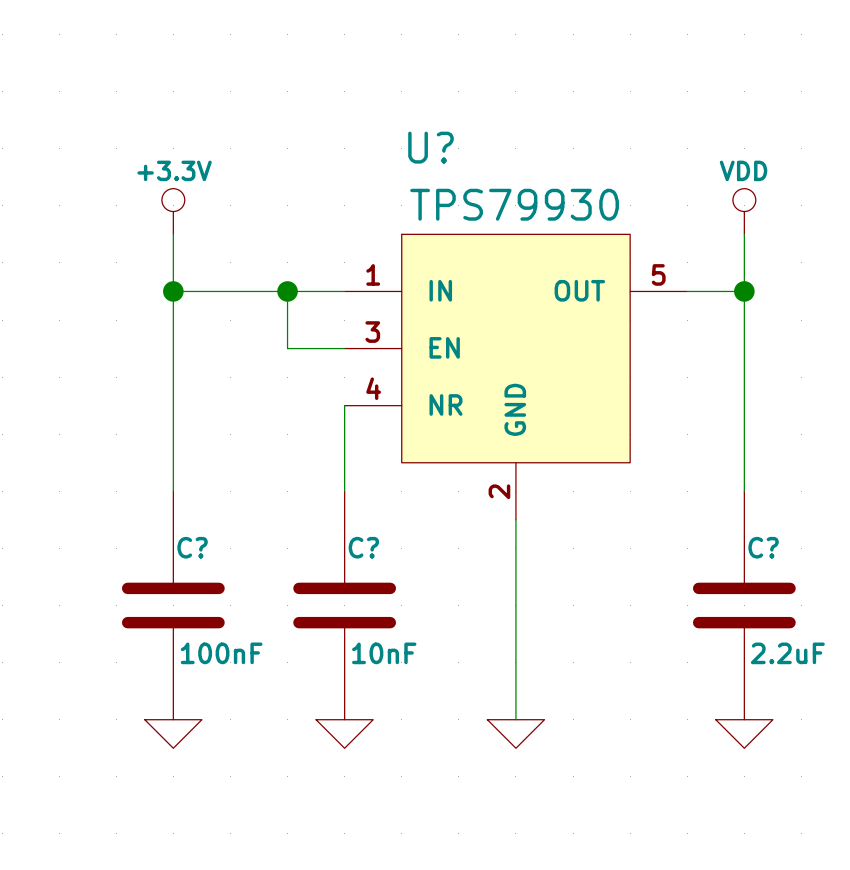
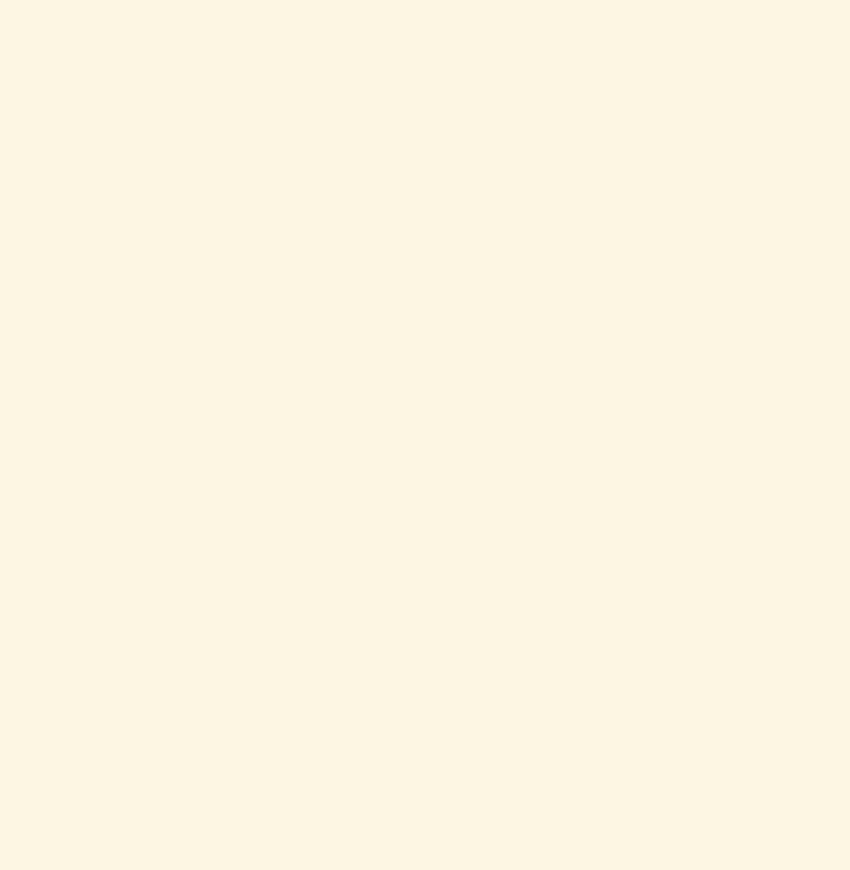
power symbol: +3.3V (173, 211) -> none
power symbol: VDD (744, 211) -> none
wire: (173, 234) (173, 491) -> none
wire: (744, 234) (744, 491) -> none
wire: (173, 291) (344, 291) -> none
junction: (173, 291) -> none
wire: (287, 291) (287, 348) (344, 348) -> none
junction: (287, 291) -> none
wire: (687, 291) (744, 291) -> none
junction: (744, 291) -> none
U?: TPS79930 (515, 377) -> none
wire: (344, 405) (344, 491) -> none
wire: (515, 519) (515, 719) -> none
C?: 100nF (173, 605) -> none
C?: 10nF (344, 605) -> none
C?: 2.2uF (744, 605) -> none
power symbol: (173, 733) -> none
power symbol: (344, 733) -> none
power symbol: (515, 733) -> none
power symbol: (744, 733) -> none

